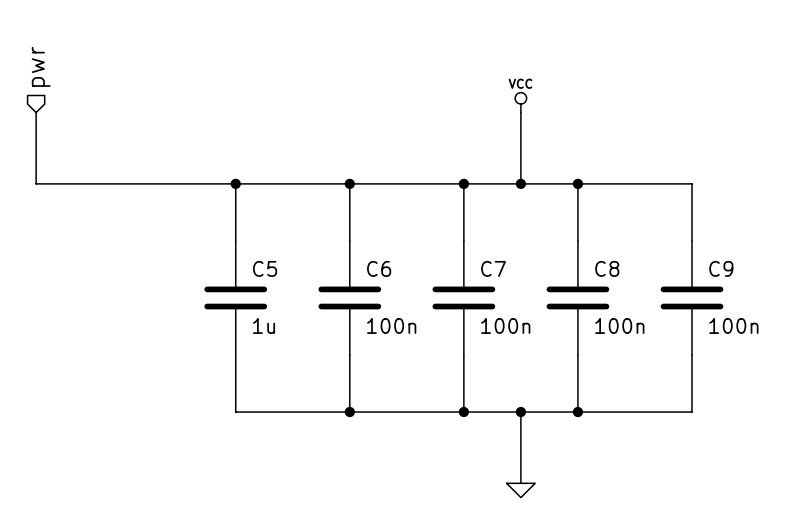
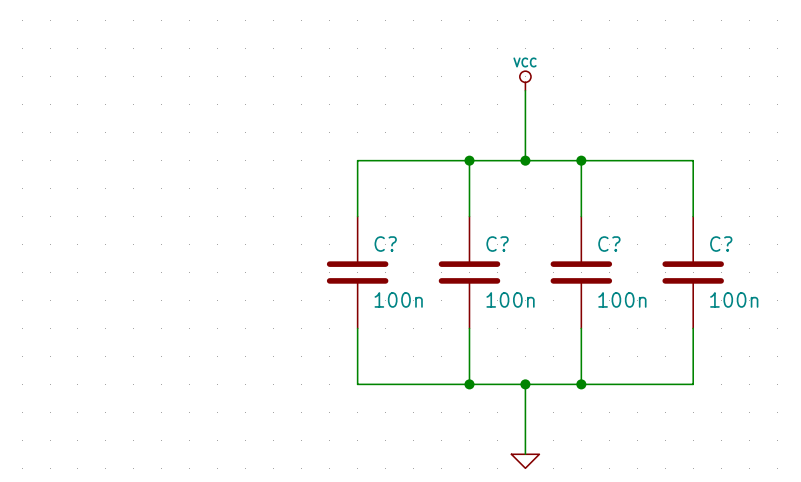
hierarchical label: pwr (41, 66) -> none
wire: (36, 112) (36, 183) (349, 183) -> none
wire: (235, 183) (235, 240) -> none
junction: (235, 183) -> none
junction: (349, 183) -> none
C6 name: C6 (379, 268) -> C? (385, 244)
C7 name: C7 (493, 268) -> C? (497, 244)
C8 name: C8 (607, 268) -> C? (609, 244)
C9 name: C9 (721, 268) -> C? (721, 244)
C5: 1u (235, 297) -> none
wire: (235, 354) (235, 412) (349, 412) -> none
junction: (349, 412) -> none

